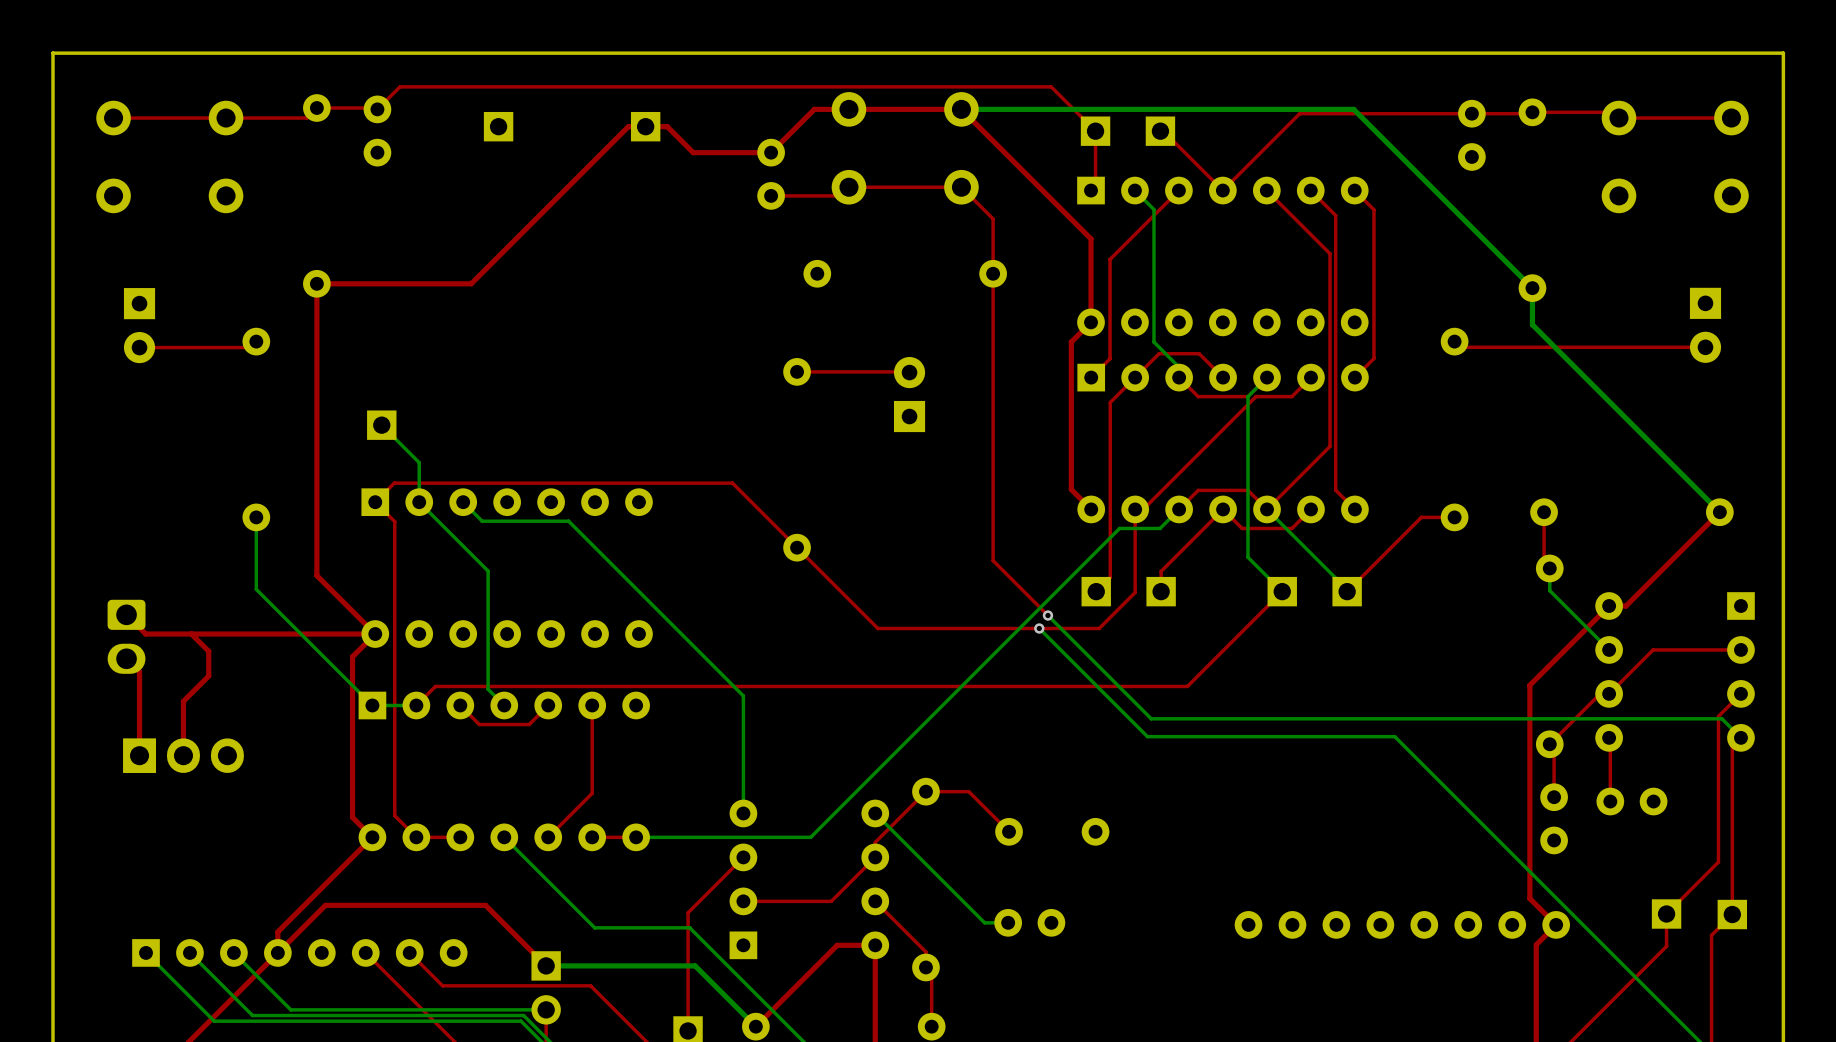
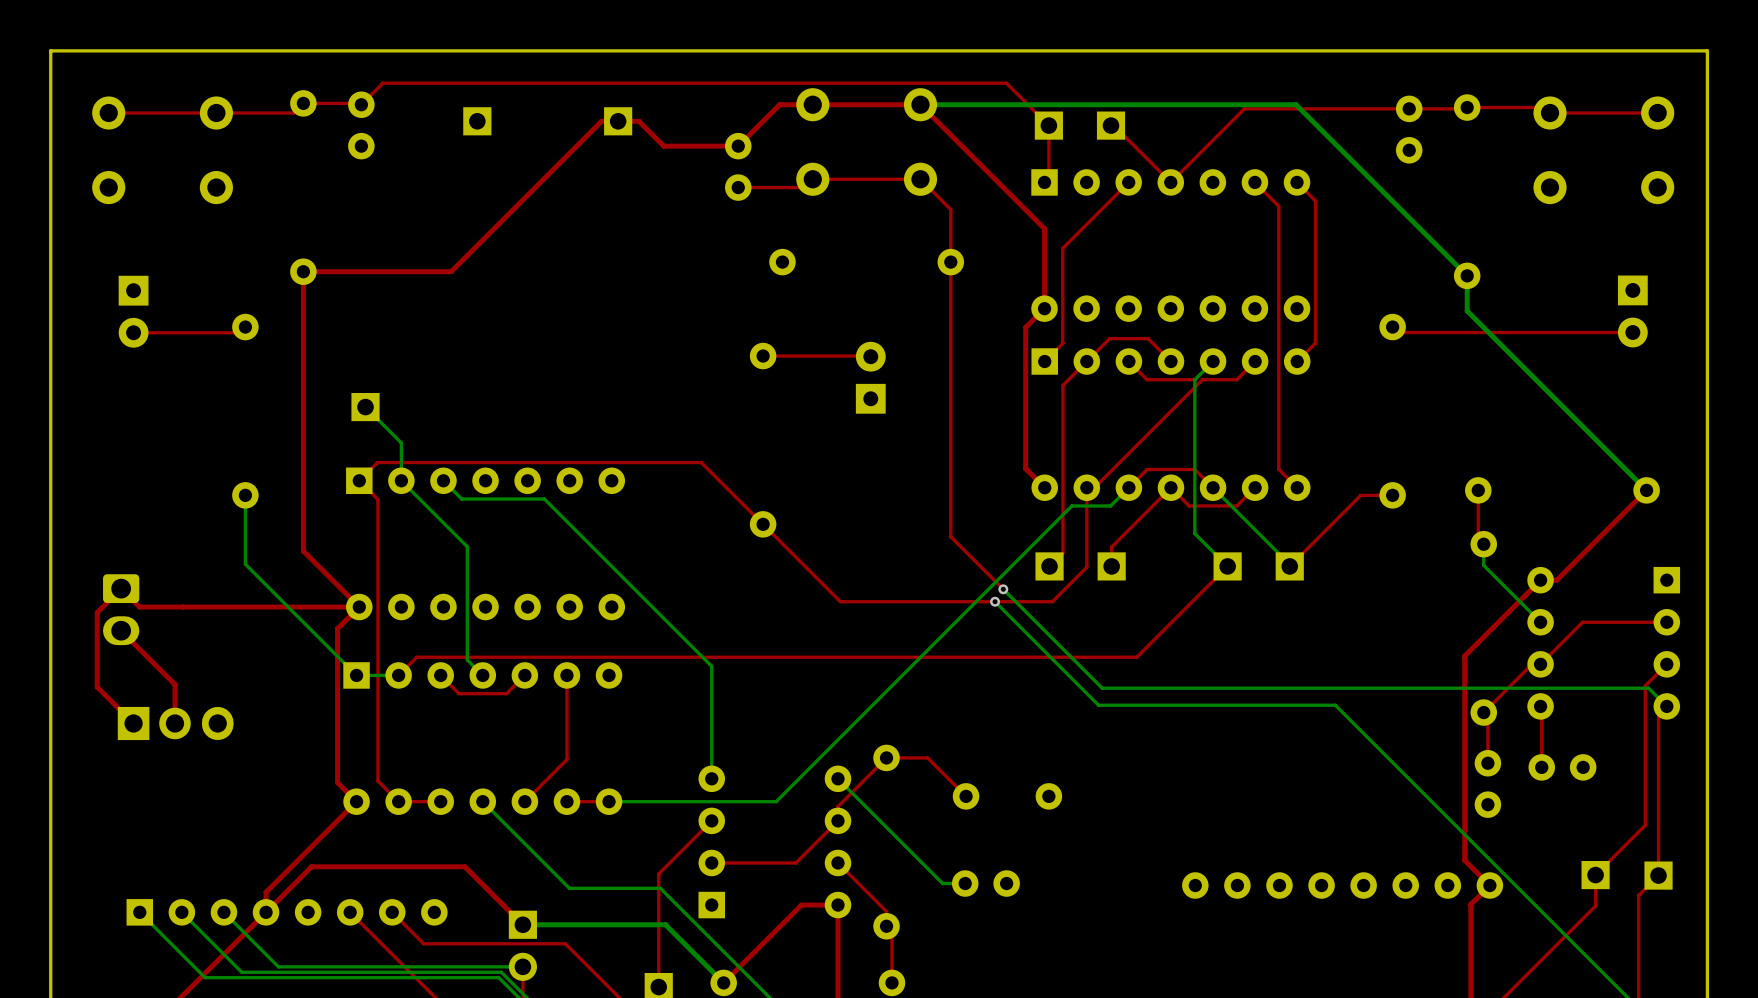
bottom track: (1134, 190) (1153, 209) (1153, 342) (1178, 367) -> none
top track: (1266, 190) (1330, 253) (1330, 446) (1267, 509) -> none
top track: none -> (121, 588) (97, 612) (97, 687) (133, 723)
top track: (191, 634) (208, 651) (208, 676) (183, 701) (183, 755) -> none
top track: (139, 671) (139, 755) -> (133, 643) (174, 684) (174, 723)
part footprint: [123, 738, 244, 773] -> [117, 706, 234, 741]

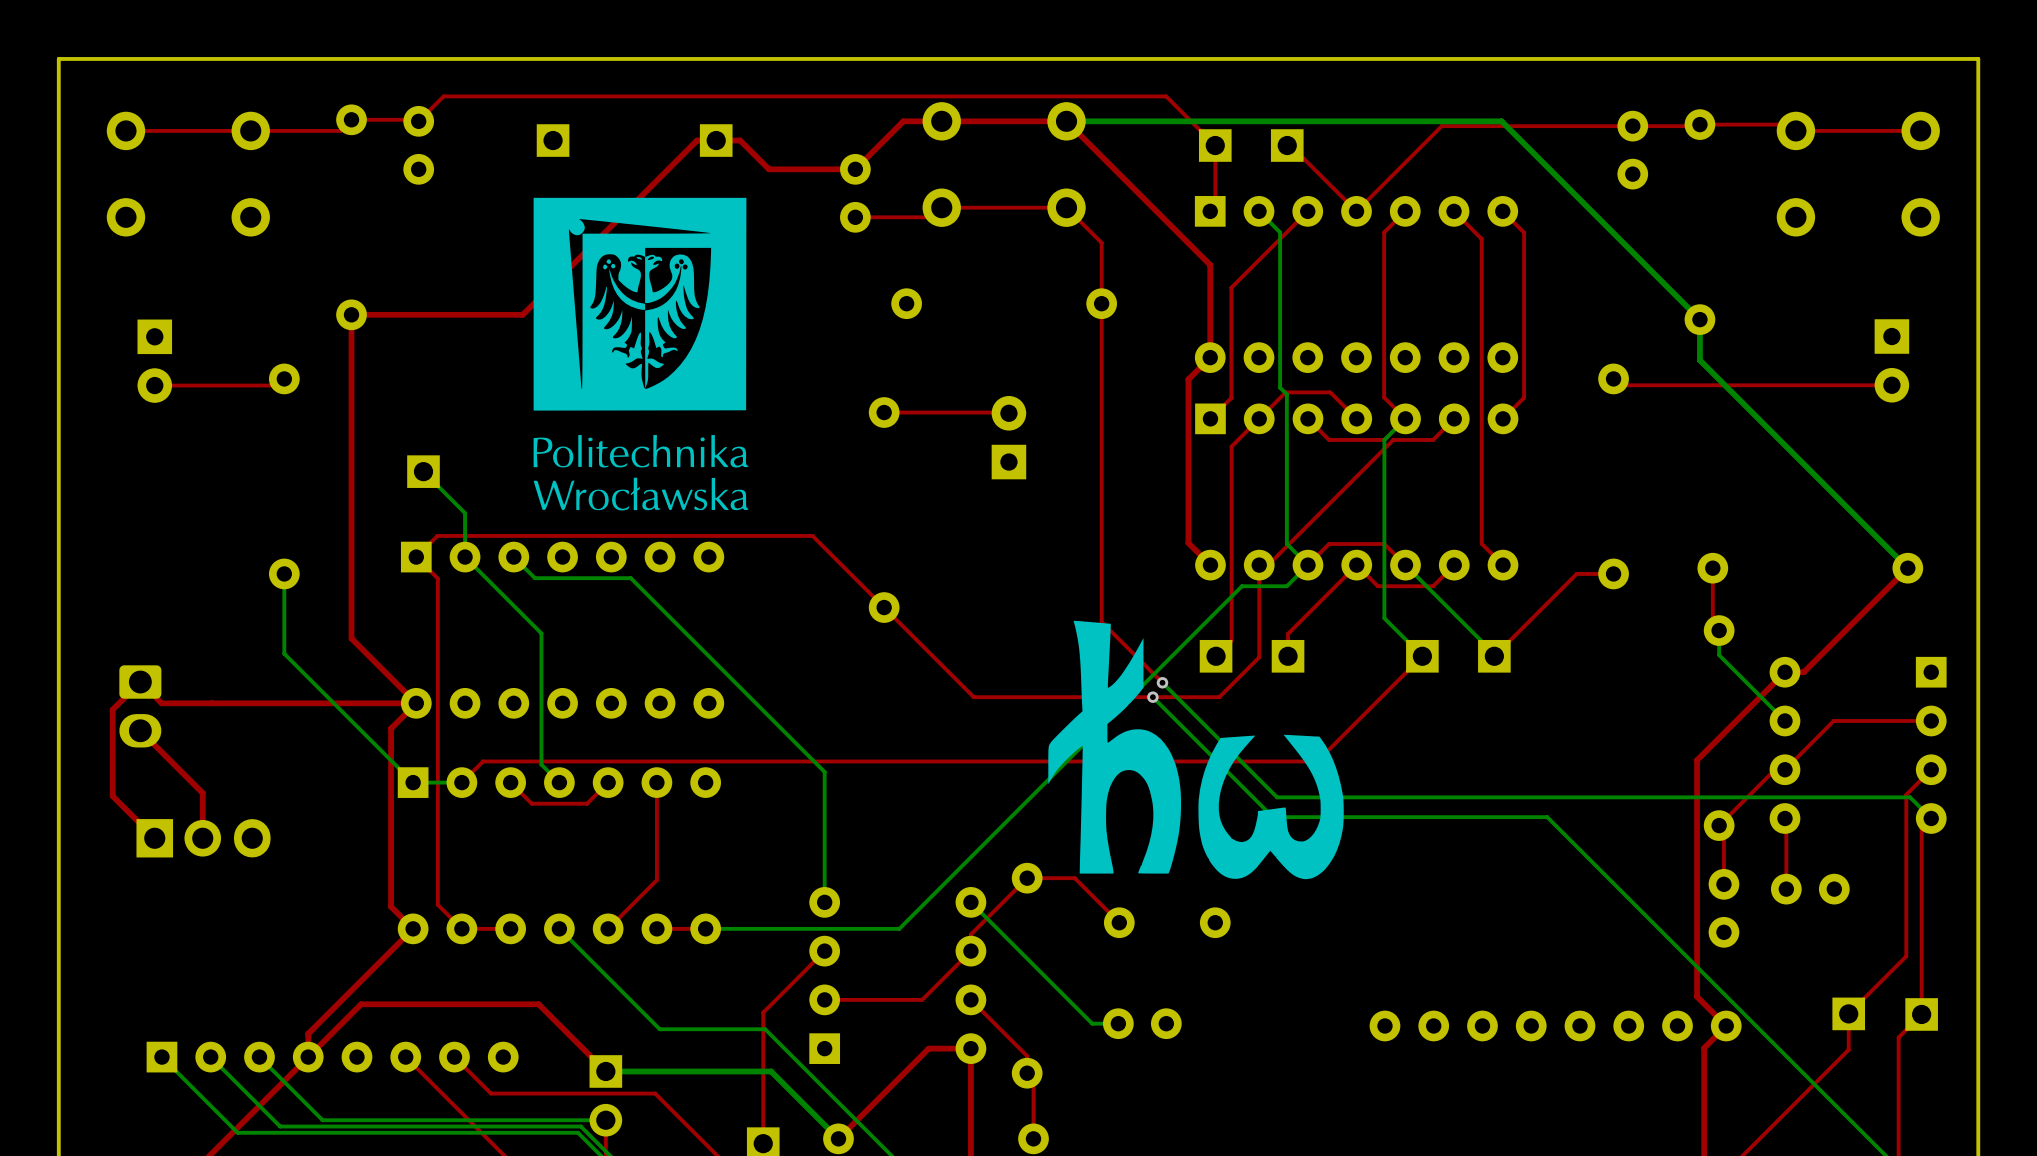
drawing: none -> [533, 197, 749, 511]
bottom track: none -> (1259, 211) (1280, 232) (1280, 387) (1286, 394) (1286, 544) (1307, 565)
top track: none -> (1405, 211) (1384, 232) (1384, 397) (1405, 418)
drawing: none -> [1048, 620, 1344, 880]

